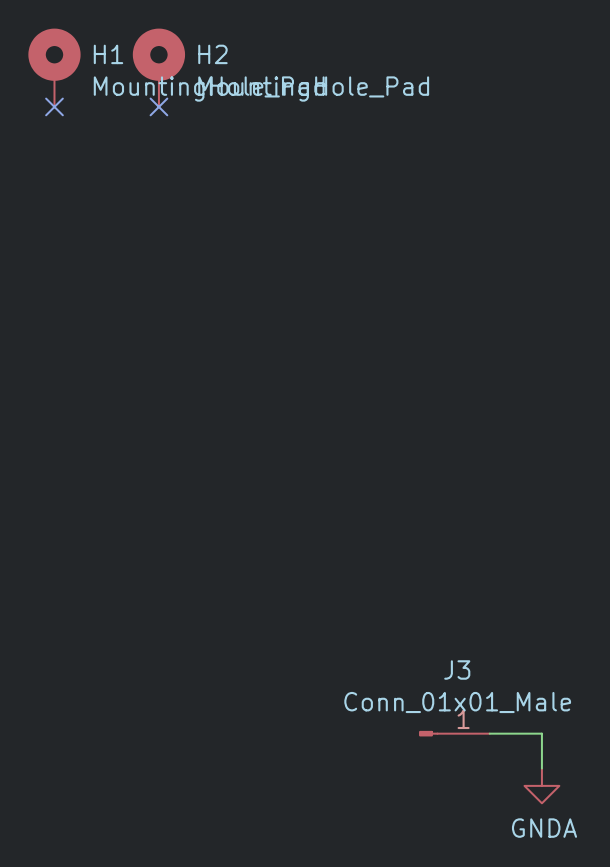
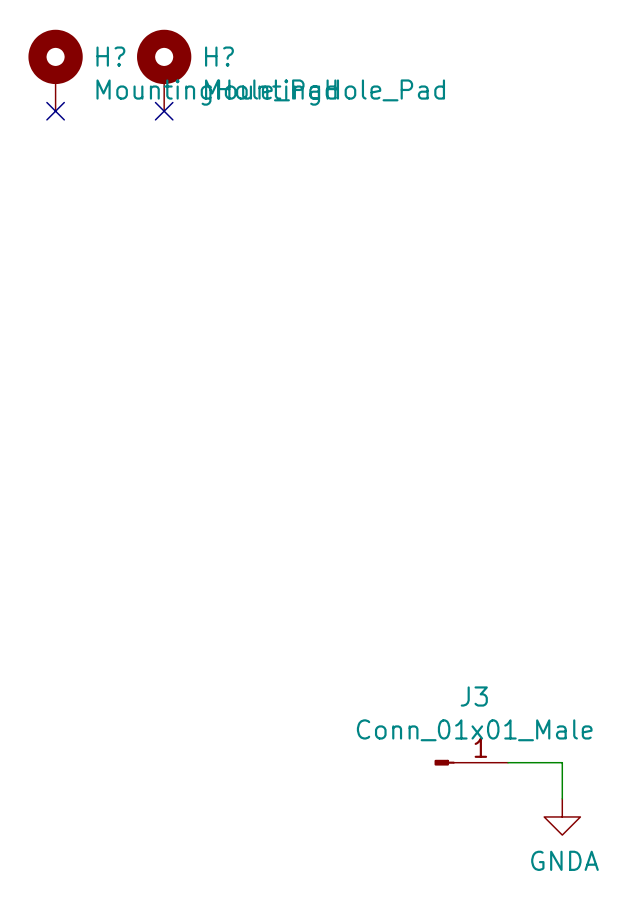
H1 name: H1 (108, 54) -> H? (110, 56)
H2 name: H2 (212, 54) -> H? (219, 56)

